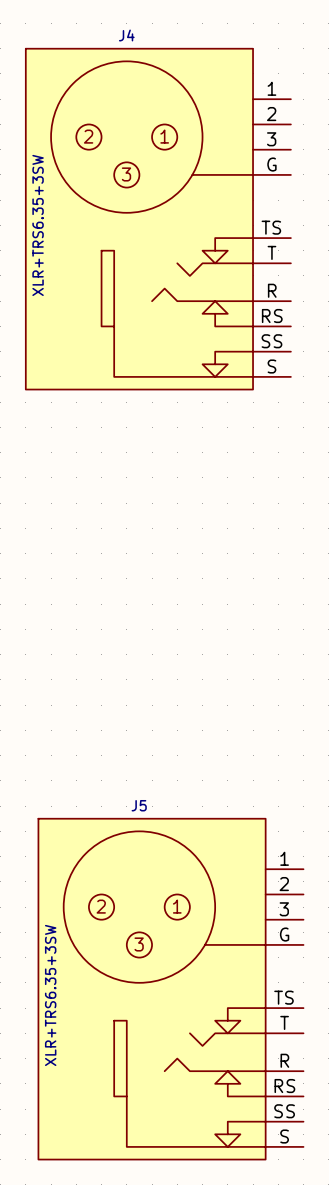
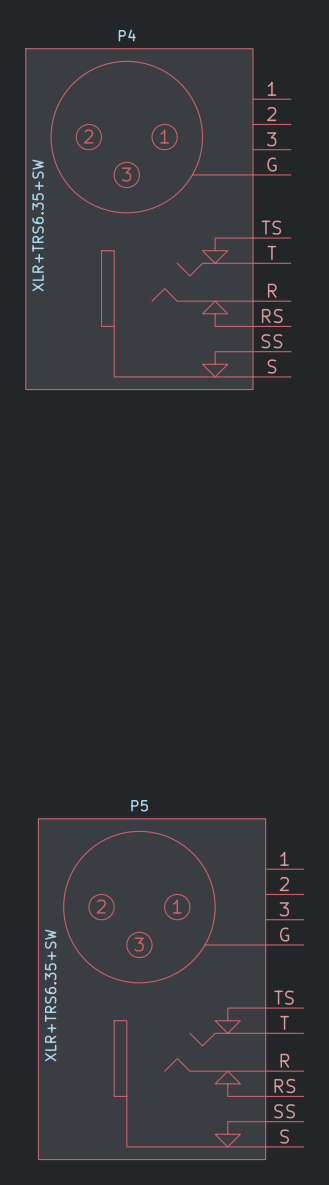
J4 name: J4 (126, 35) -> P4 (127, 35)
J4 value: XLR+TRS6.35+3SW (38, 225) -> XLR+TRS6.35+SW (38, 225)
J5 name: J5 (139, 805) -> P5 (139, 805)
J5 value: XLR+TRS6.35+3SW (50, 995) -> XLR+TRS6.35+SW (50, 995)

